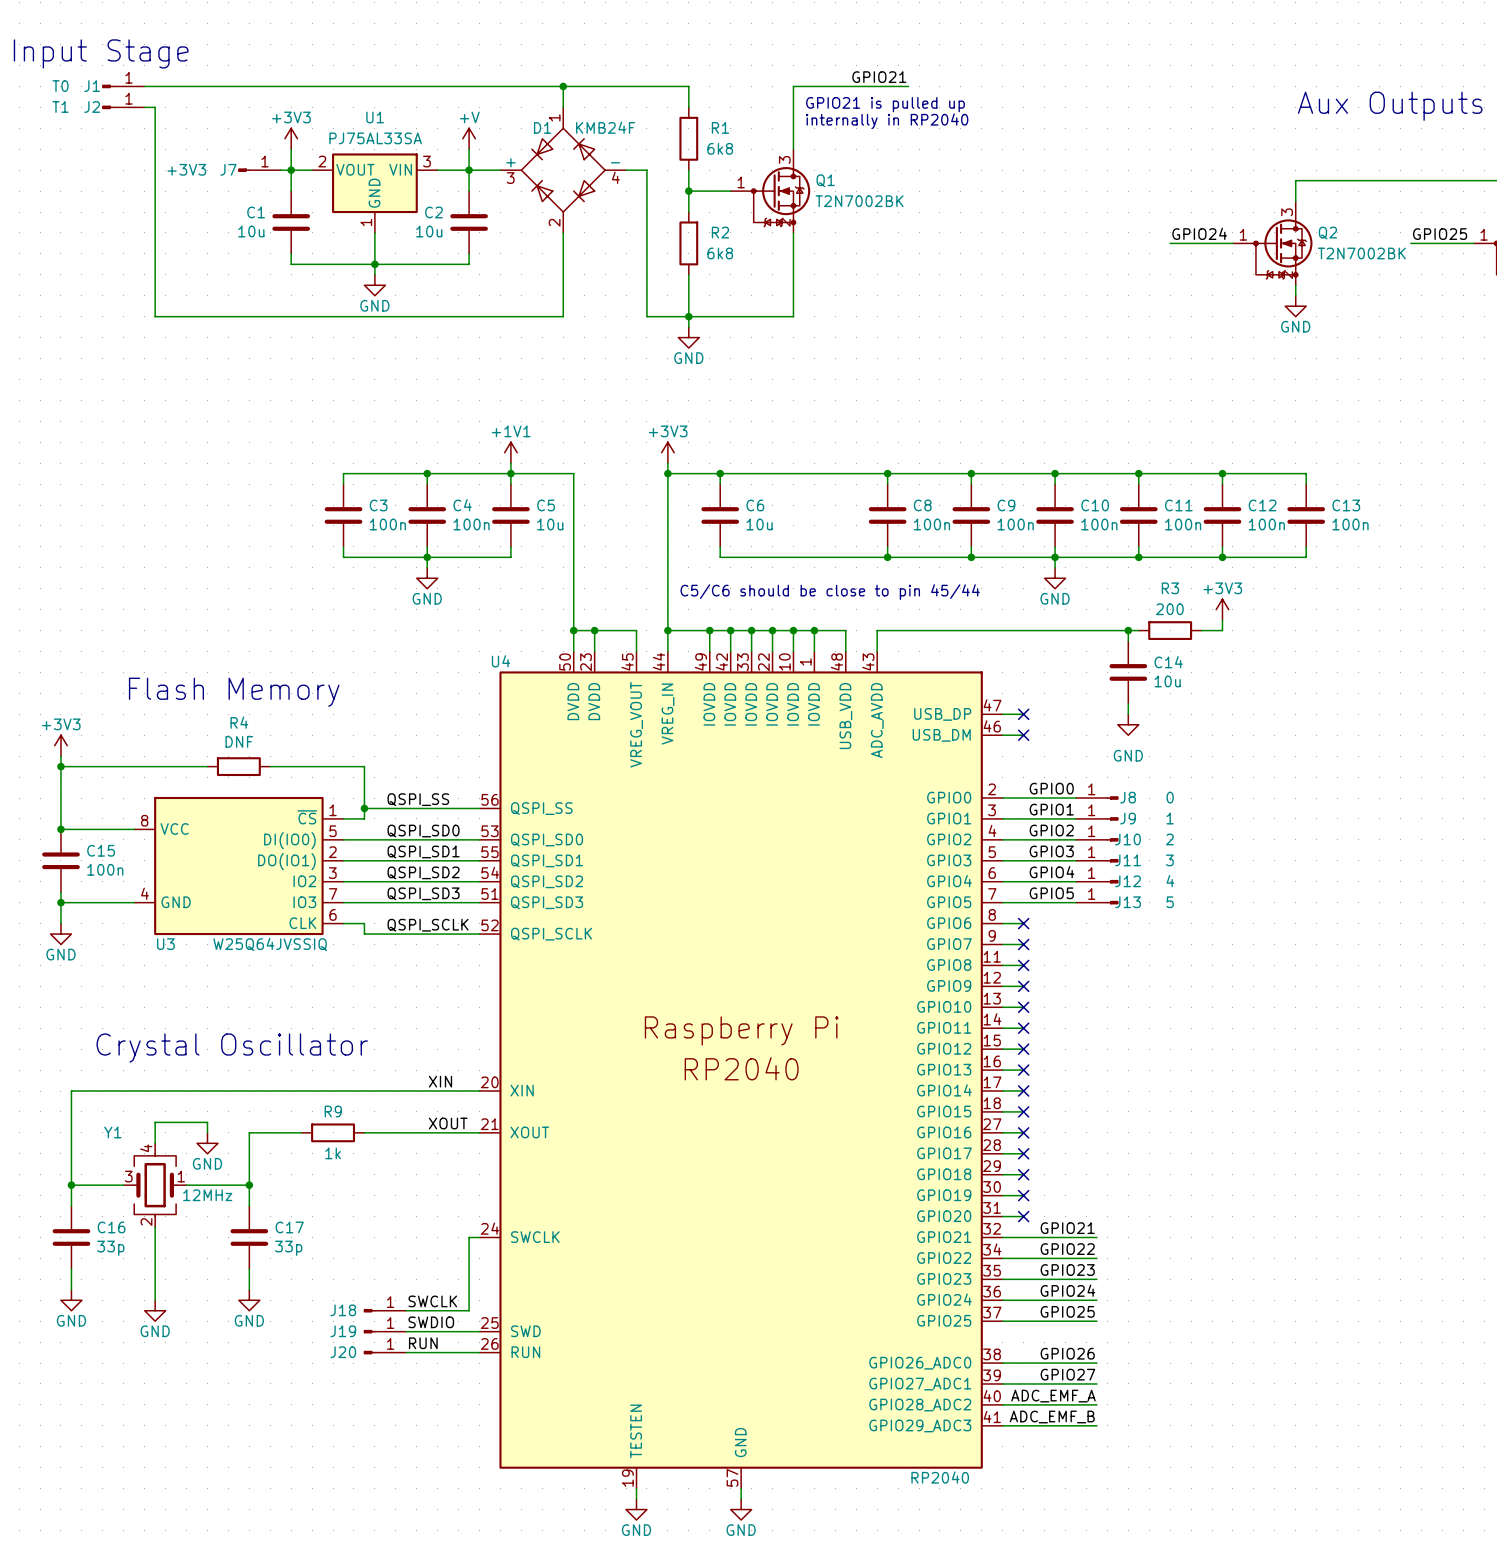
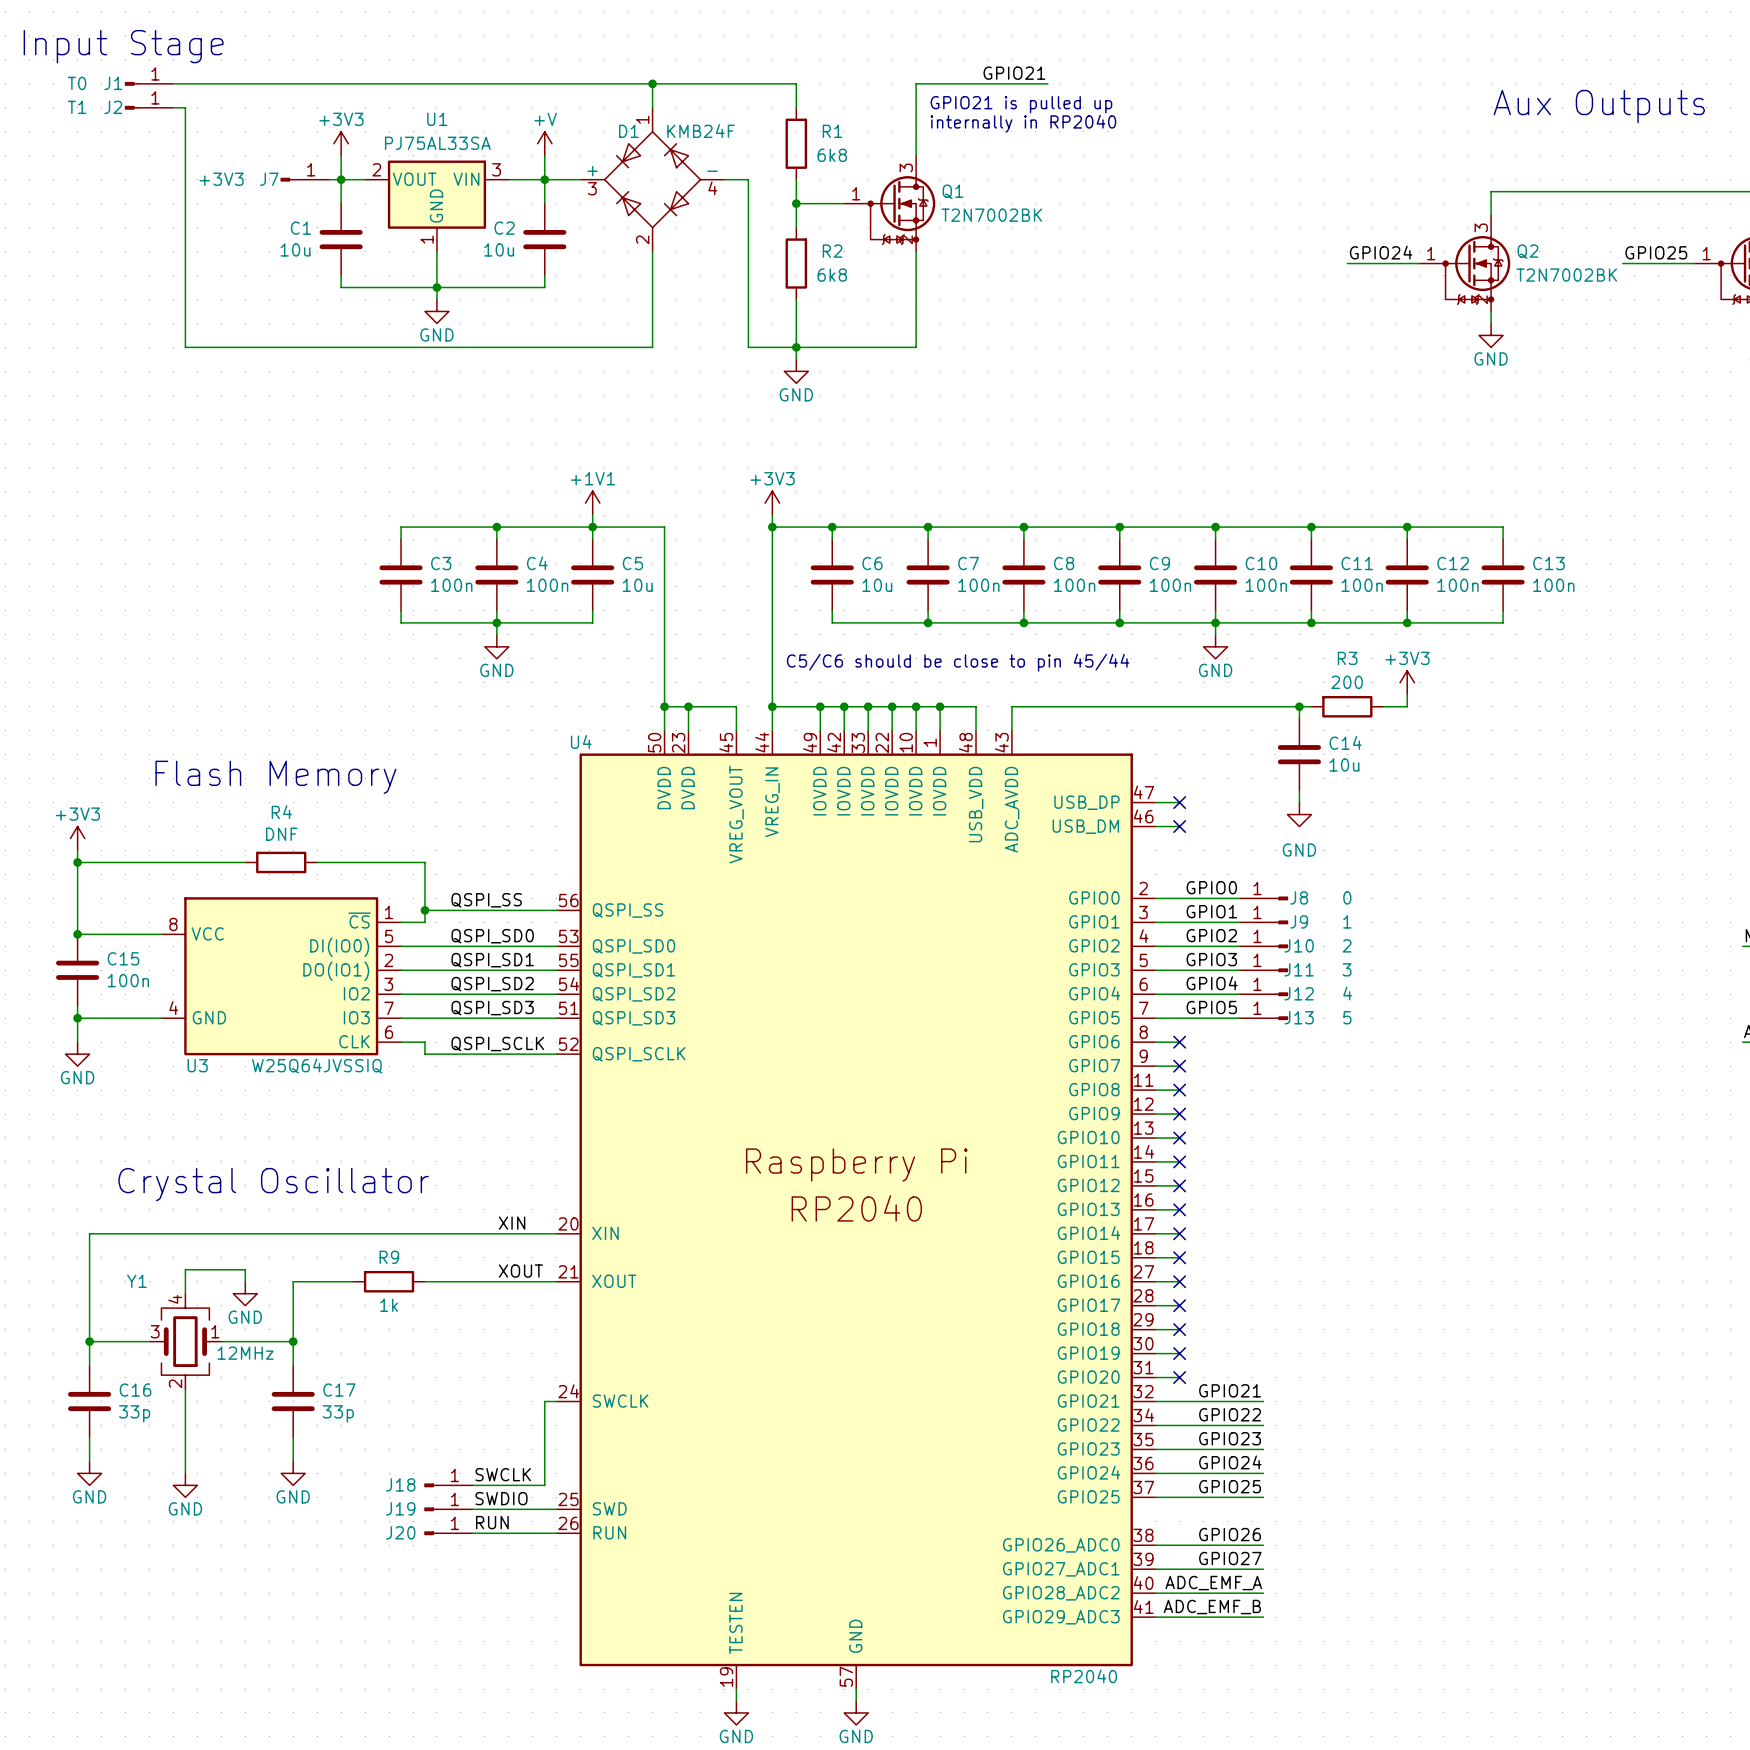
wire: none -> (928, 527) (928, 539)
junction: none -> (928, 527)
C7: none -> 100n (928, 574)
wire: none -> (928, 610) (928, 622)
junction: none -> (928, 622)

